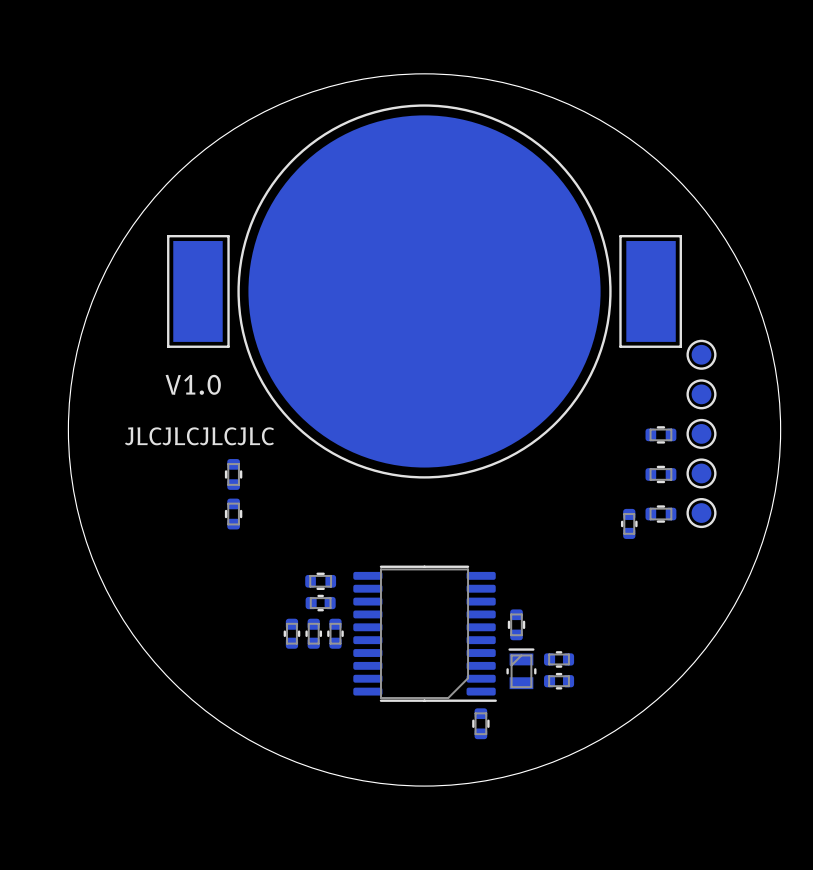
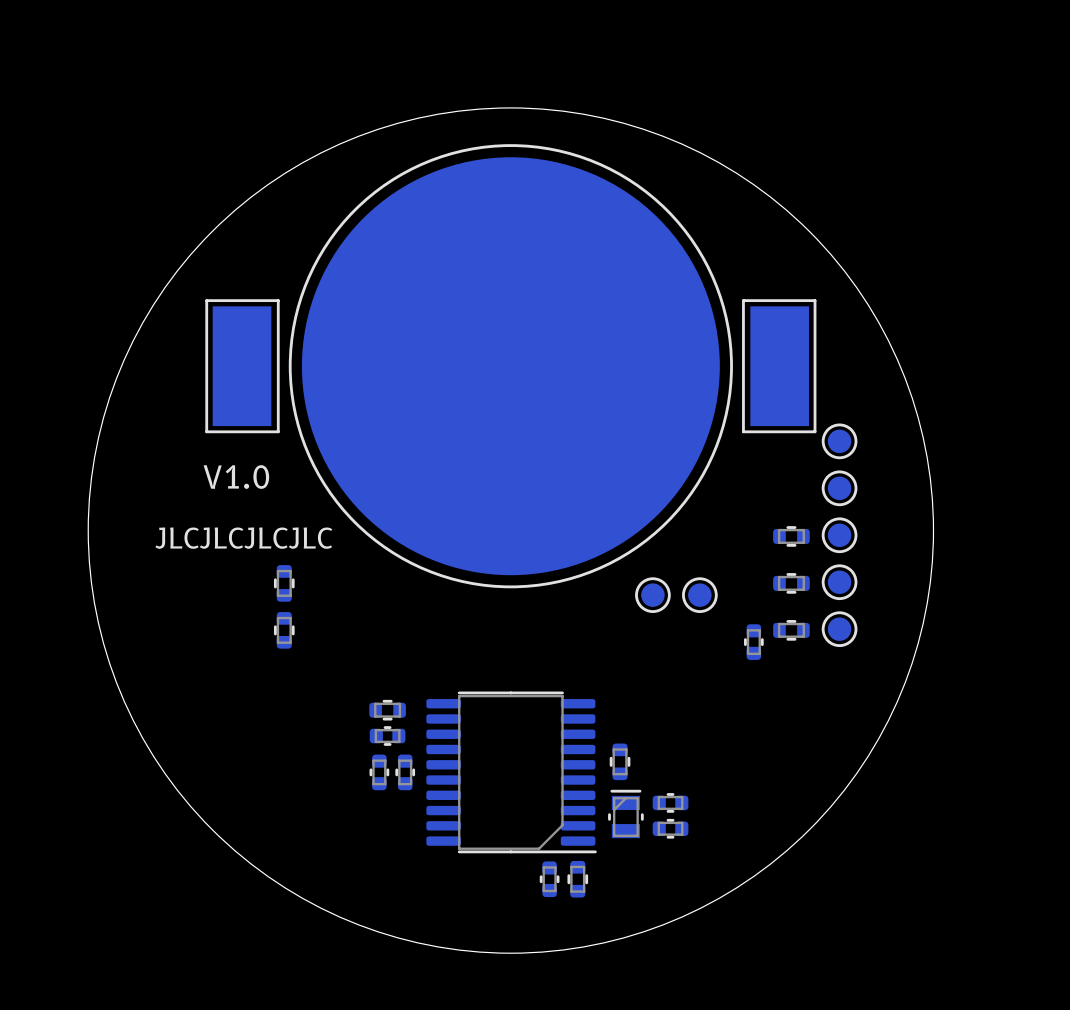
part: none -> (652, 595)
part: none -> (699, 595)
part position: (291, 633) -> (549, 879)

